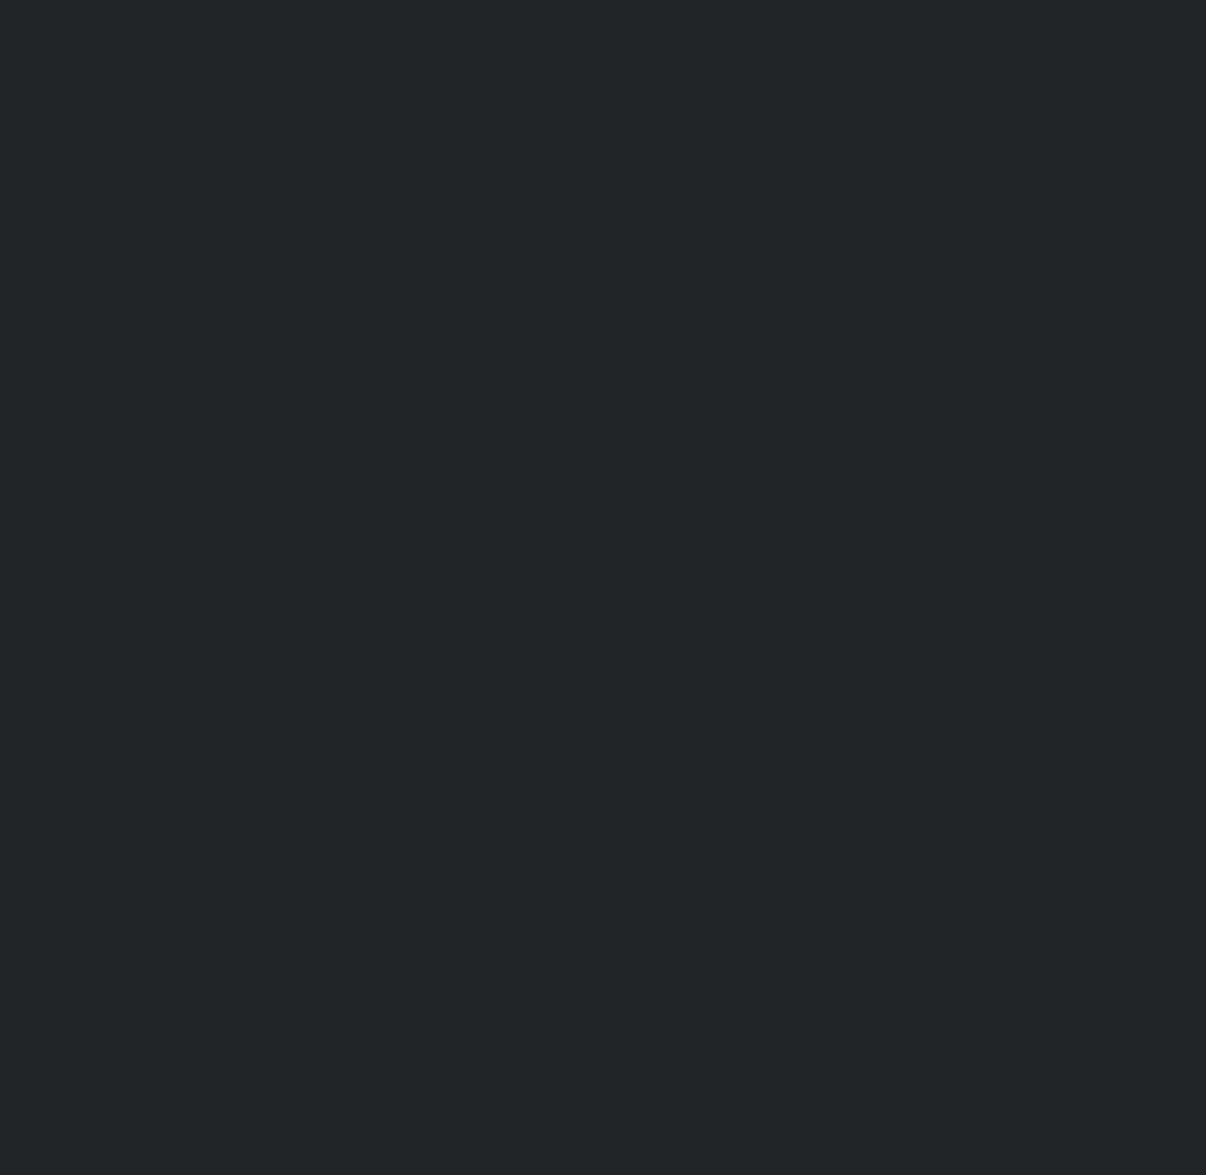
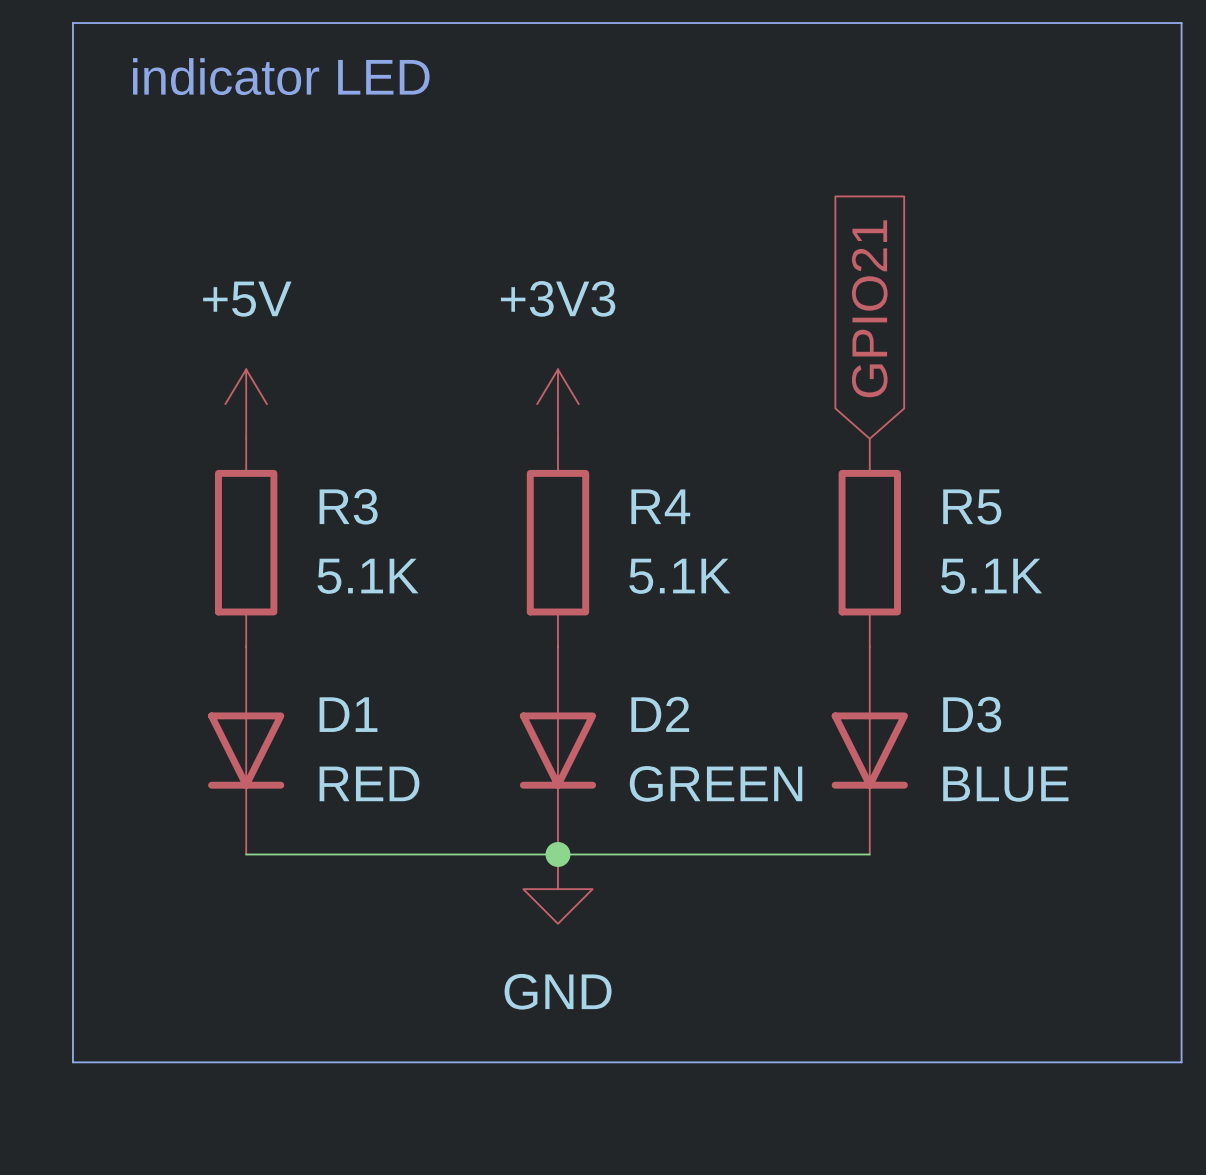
line: none -> (72, 23) (1181, 23) (1181, 1062) (72, 1062) (72, 23)
text: none -> indicator LED (281, 76)
global label: none -> GPIO21 (869, 308)
power symbol: none -> +5V (246, 404)
power symbol: none -> +3V3 (557, 404)
R3: none -> 5.1K (246, 542)
R4: none -> 5.1K (557, 542)
R5: none -> 5.1K (869, 542)
D1: none -> RED (246, 750)
D2: none -> GREEN (557, 750)
D3: none -> BLUE (869, 750)
wire: none -> (246, 854) (869, 854)
junction: none -> (557, 854)
power symbol: none -> GND (557, 889)

